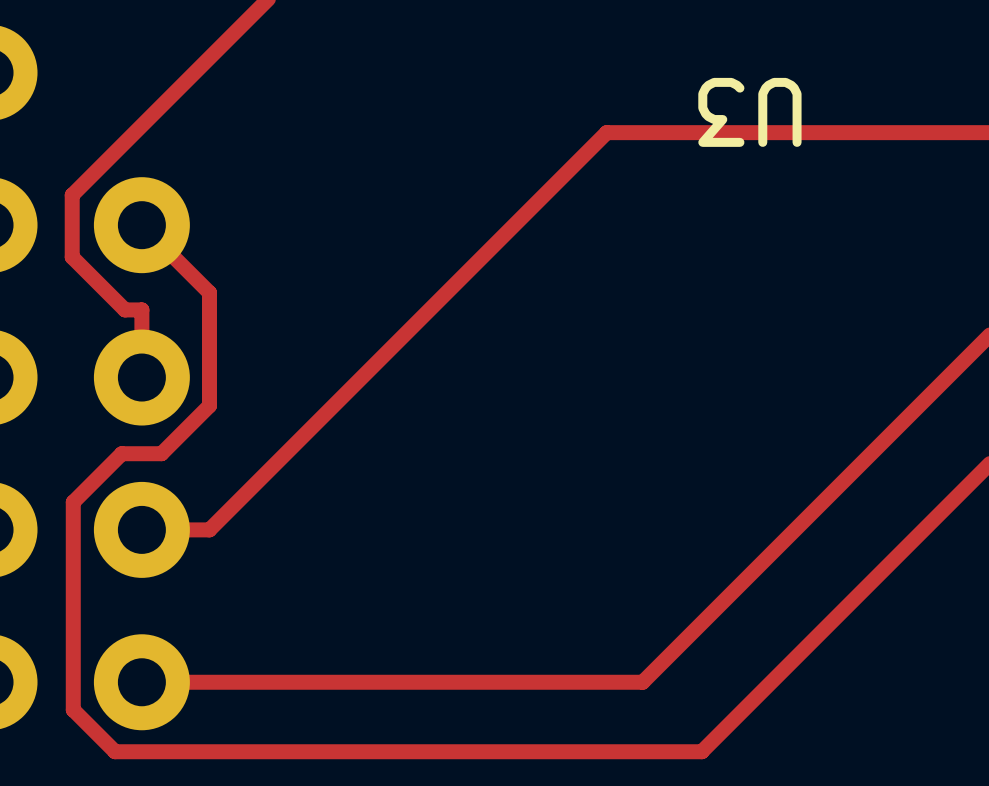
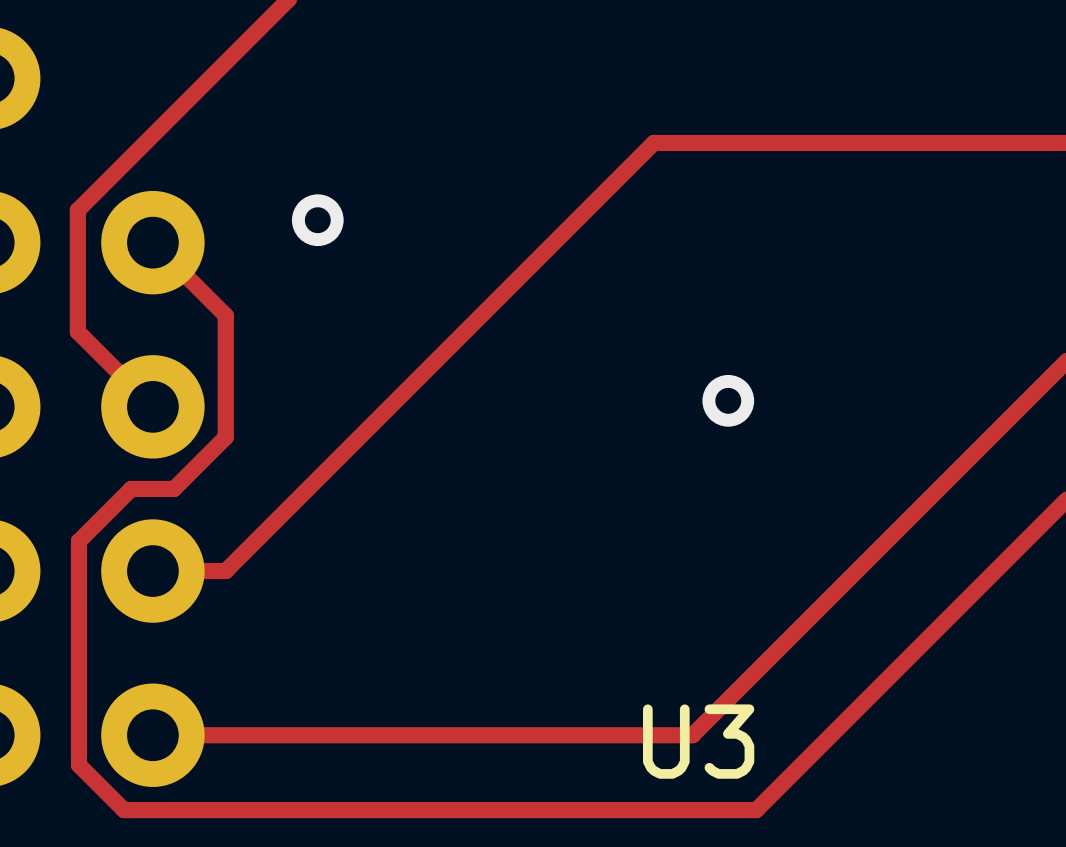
U3 name rotation: 0° (749, 112) -> 180° (698, 741)
U3 name position: U3 (749, 112) -> U3 (698, 741)
via: none -> (317, 220)
track: (72, 257) (124, 309) (141, 309) (141, 377) -> (77, 277) (77, 331) (152, 406)
via: none -> (728, 400)

